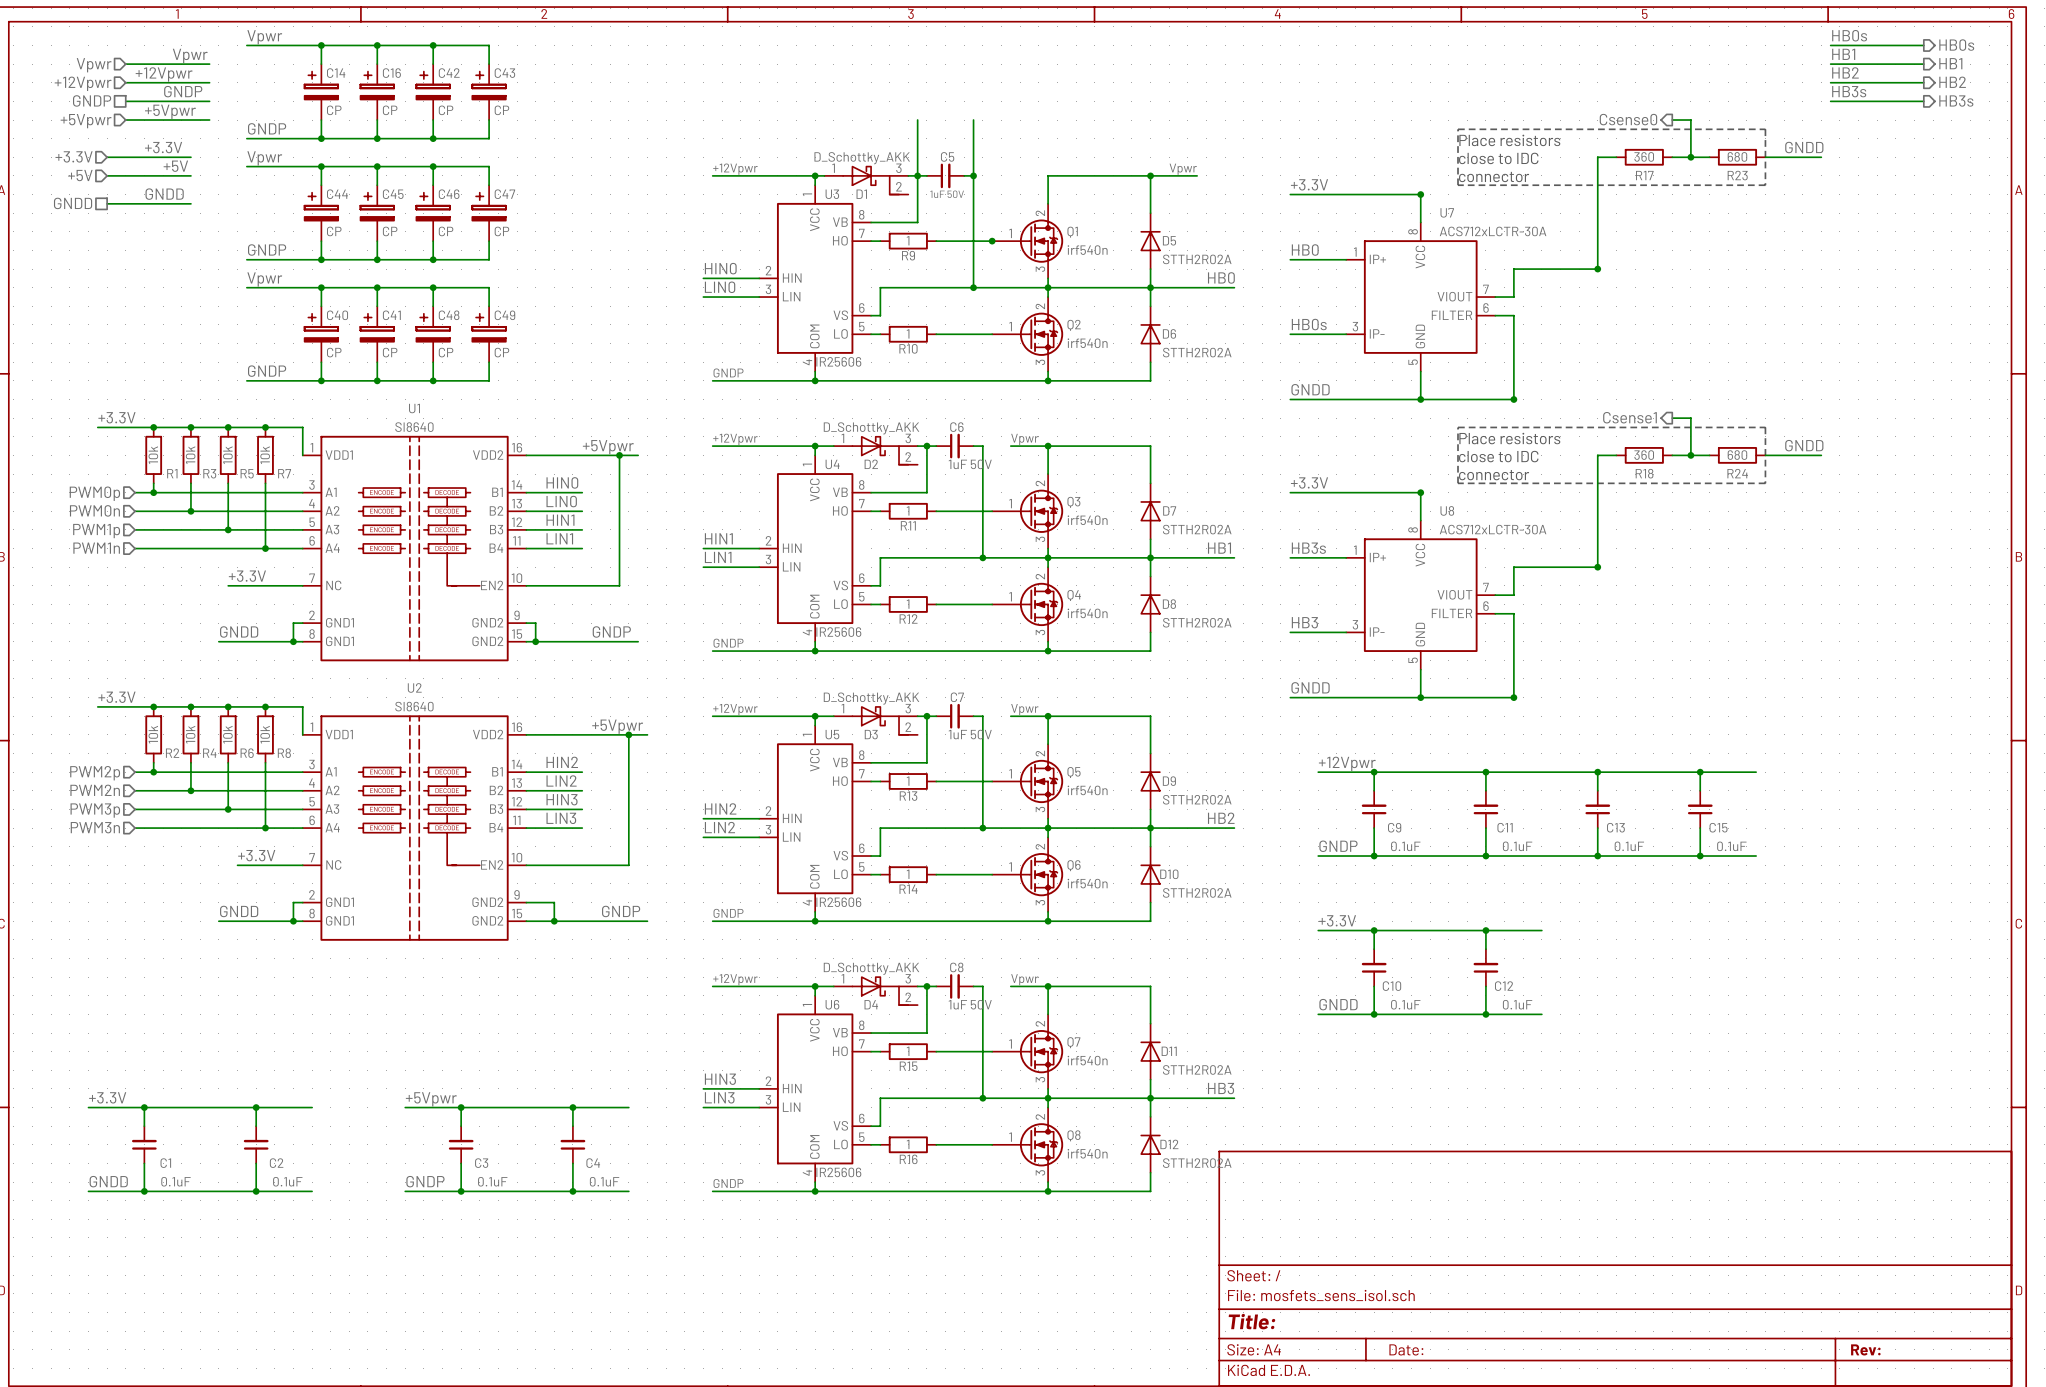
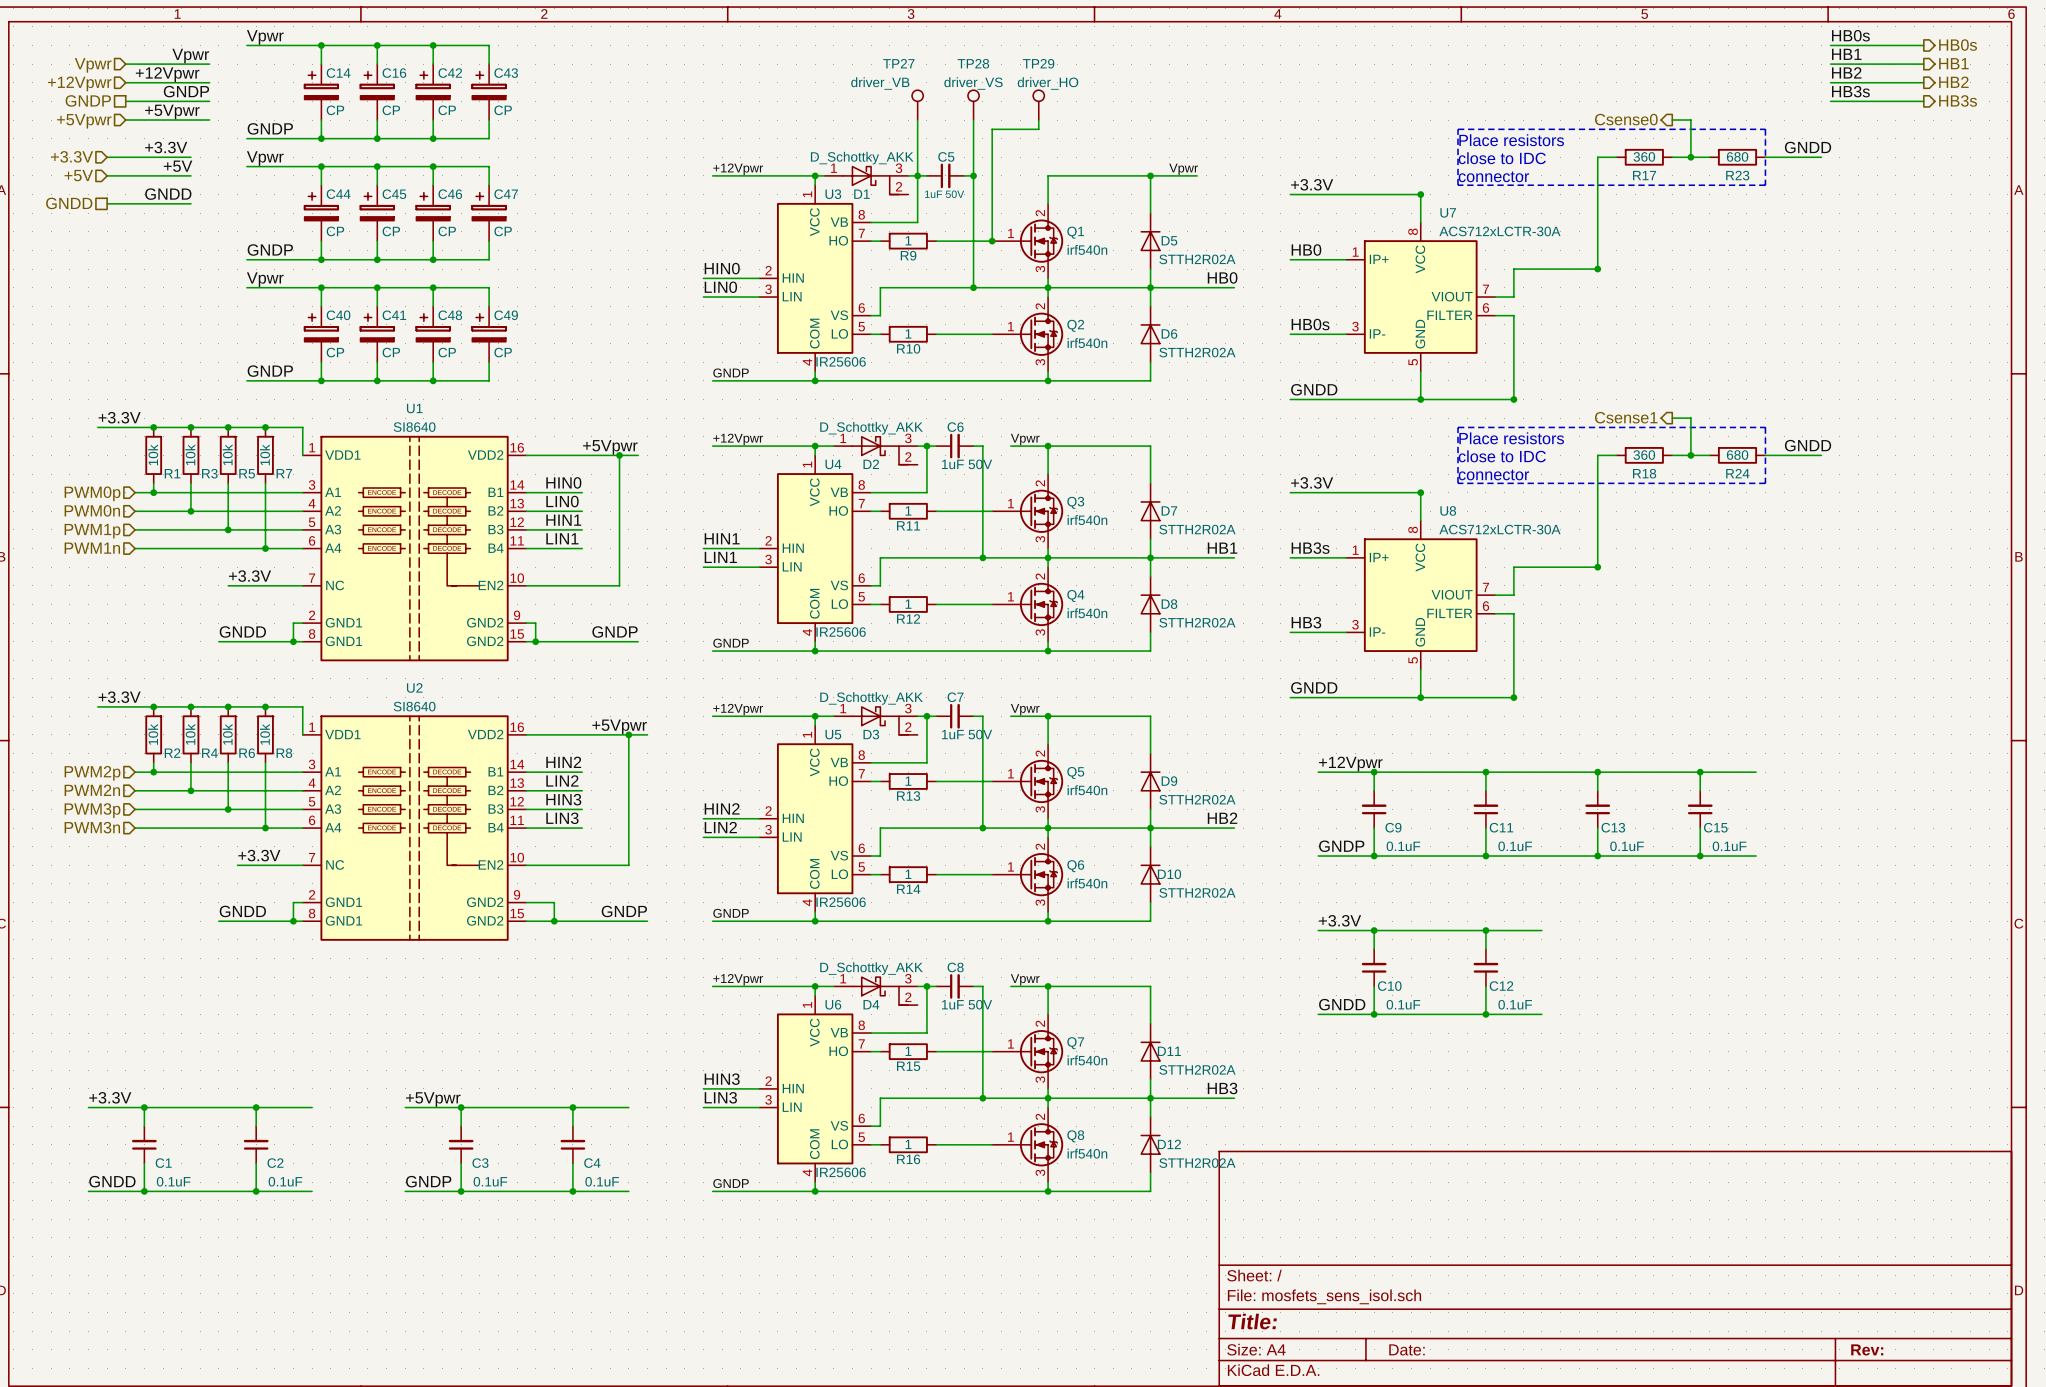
TP27: none -> driver_VB (917, 105)
TP28: none -> driver_VS (973, 105)
TP29: none -> driver_HO (1038, 105)
wire: none -> (1038, 120) (1038, 129) (992, 129) (992, 241)

